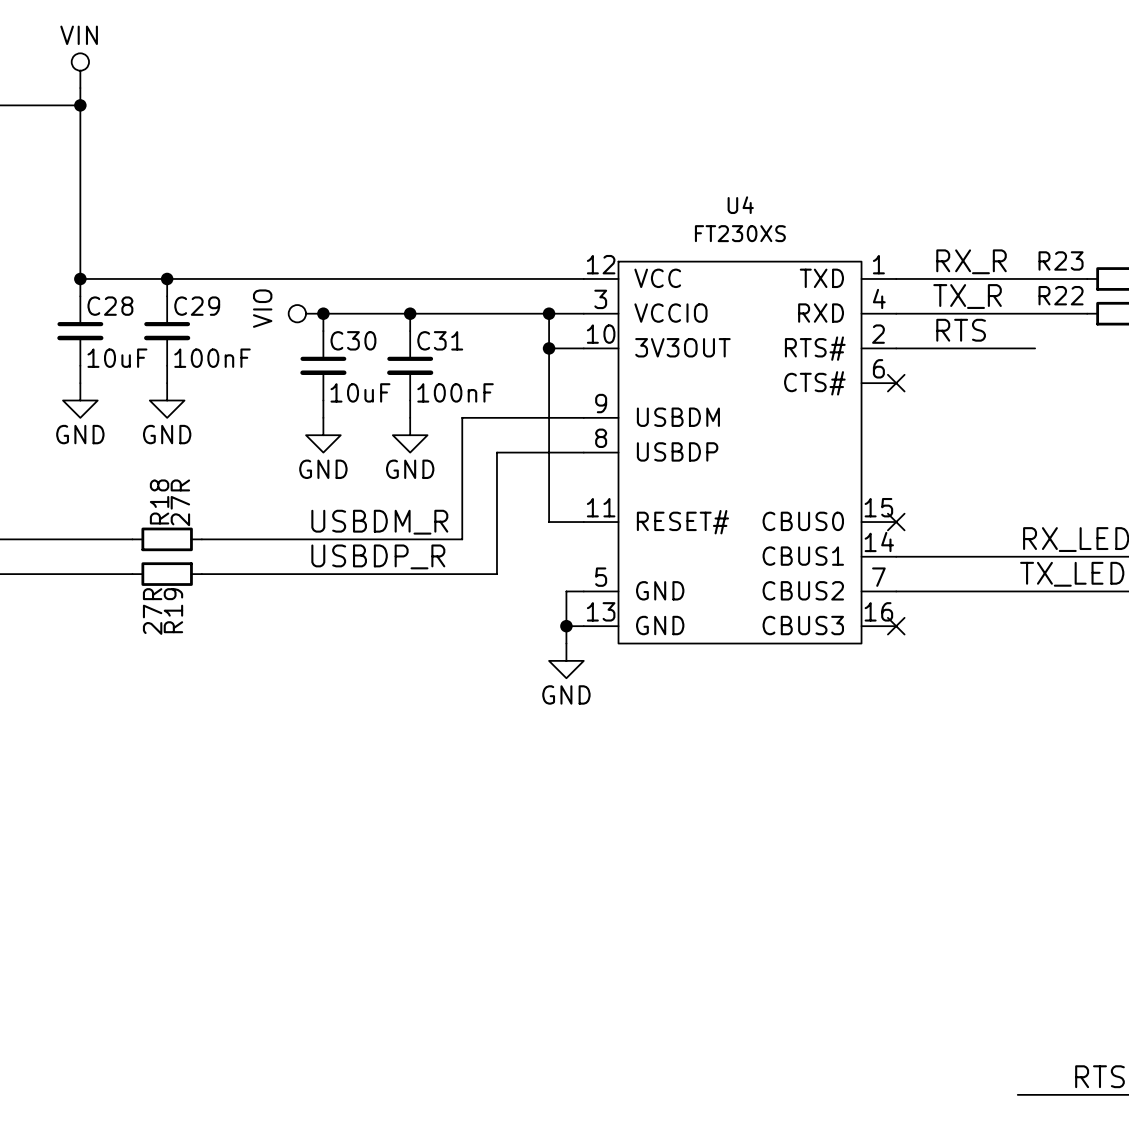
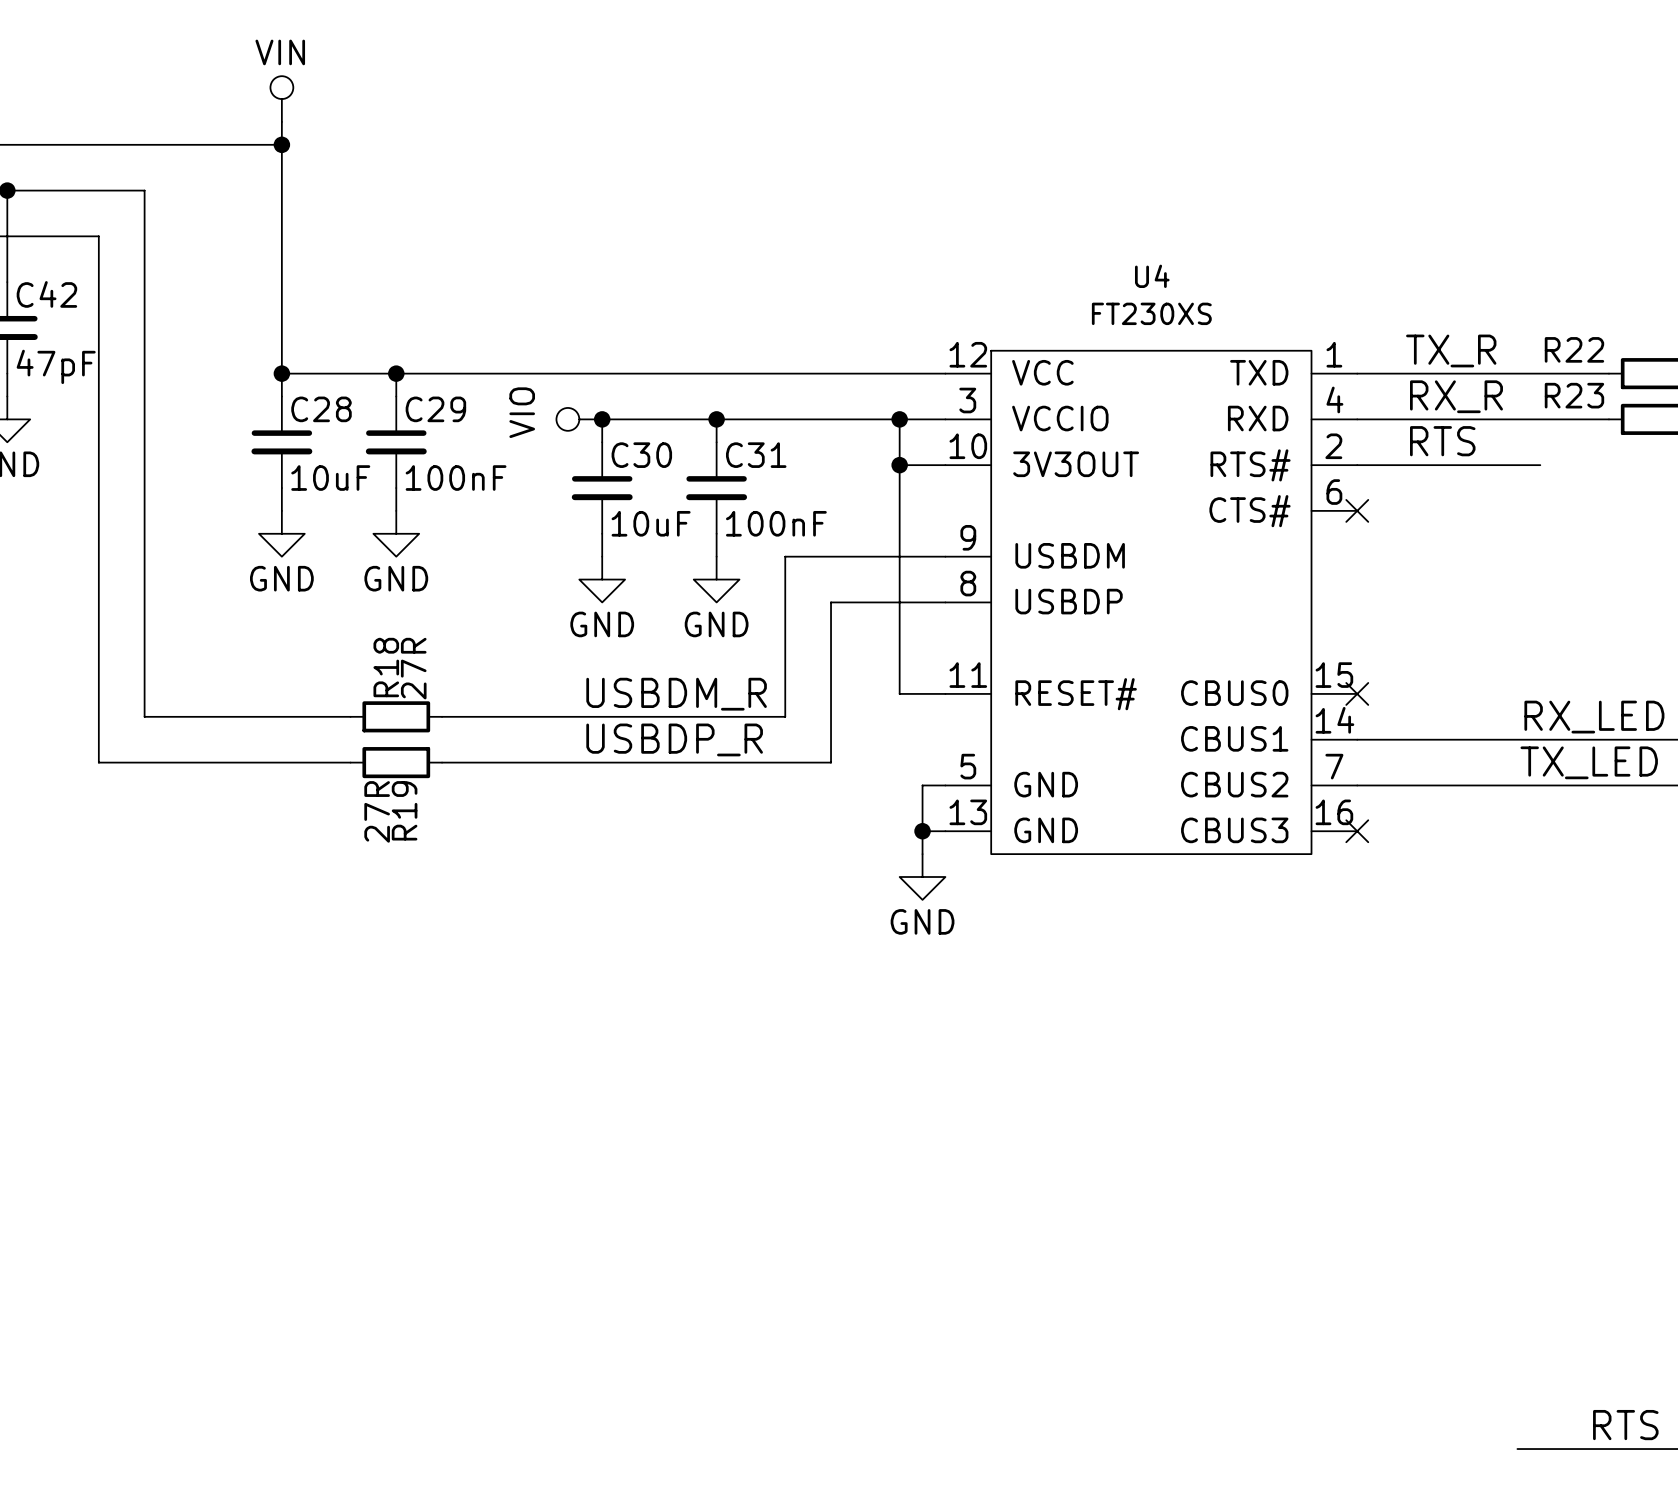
R23 name: R23 (1061, 260) -> R22 (1574, 349)
label: RX_R (971, 261) -> TX_R (1451, 350)
R22 name: R22 (1061, 295) -> R23 (1574, 395)
label: TX_R (967, 296) -> RX_R (1456, 396)

